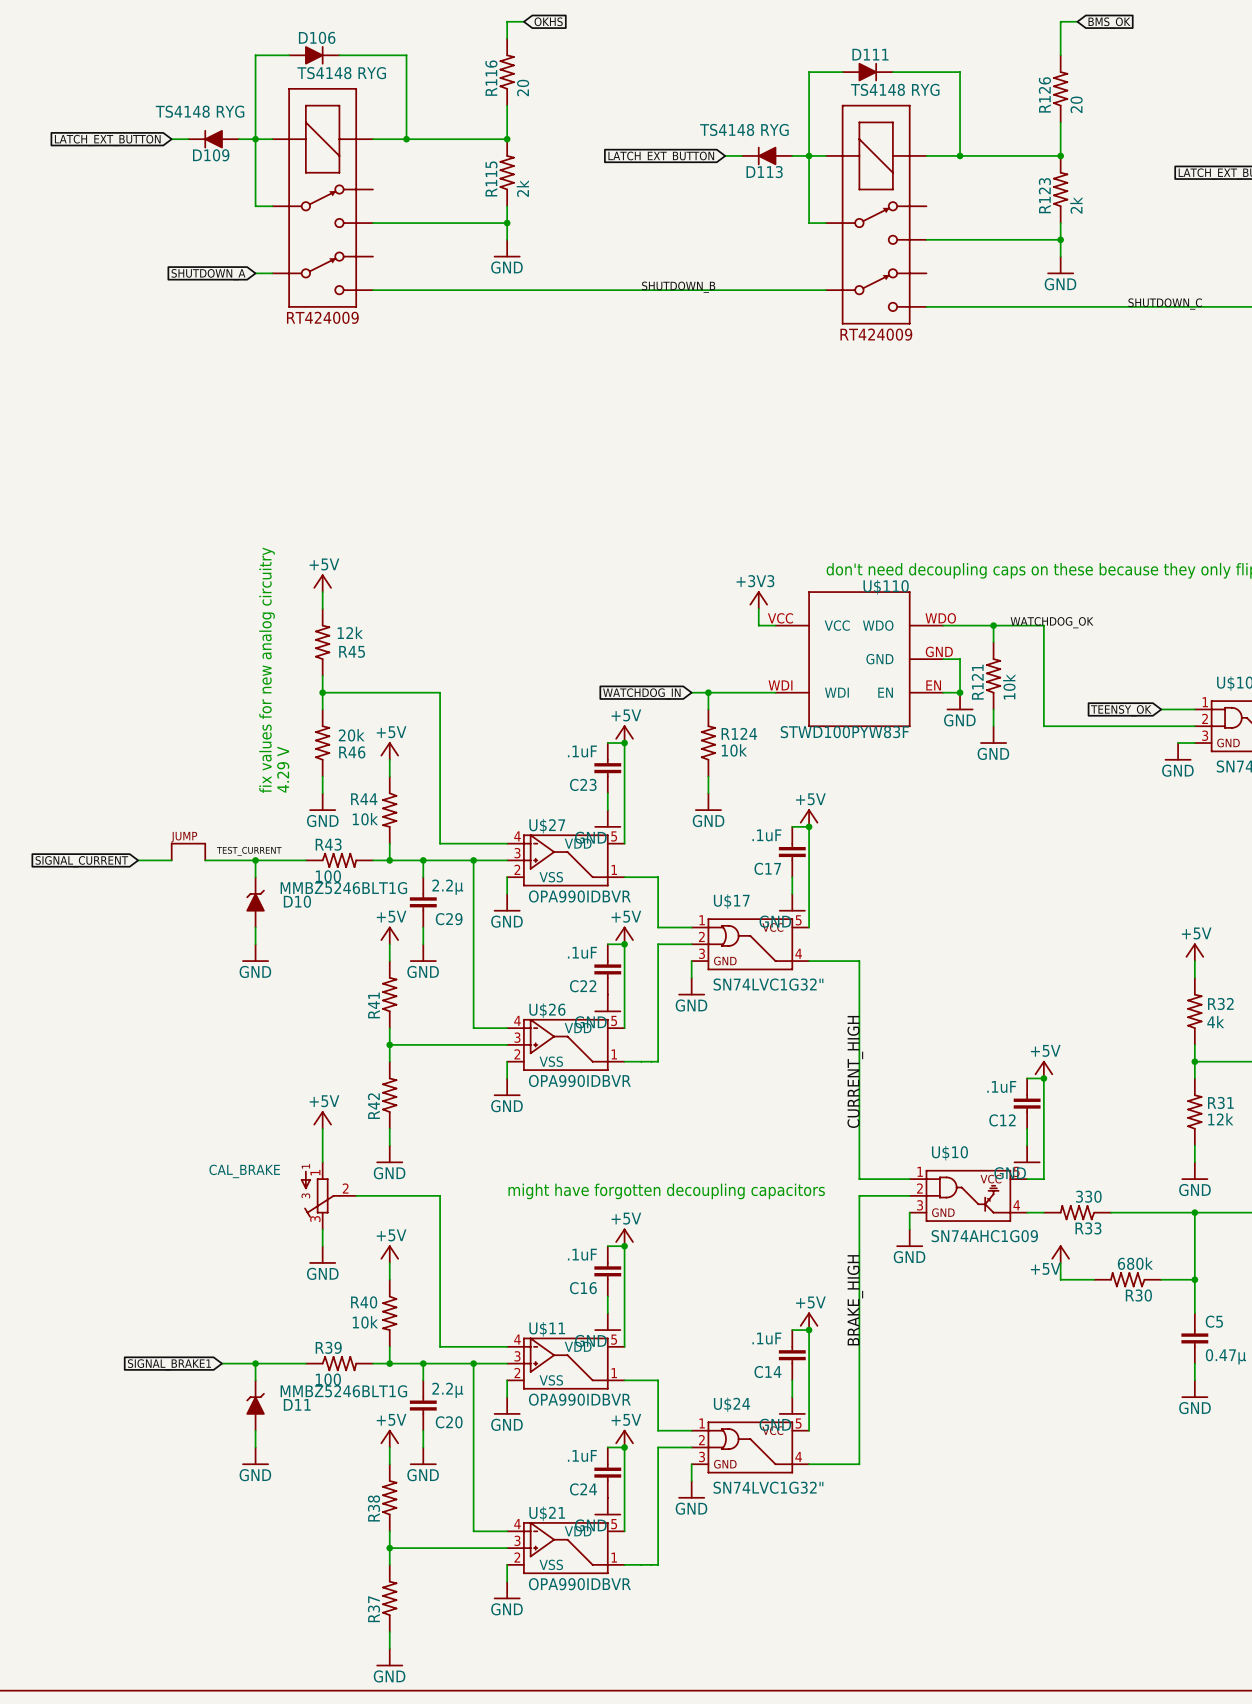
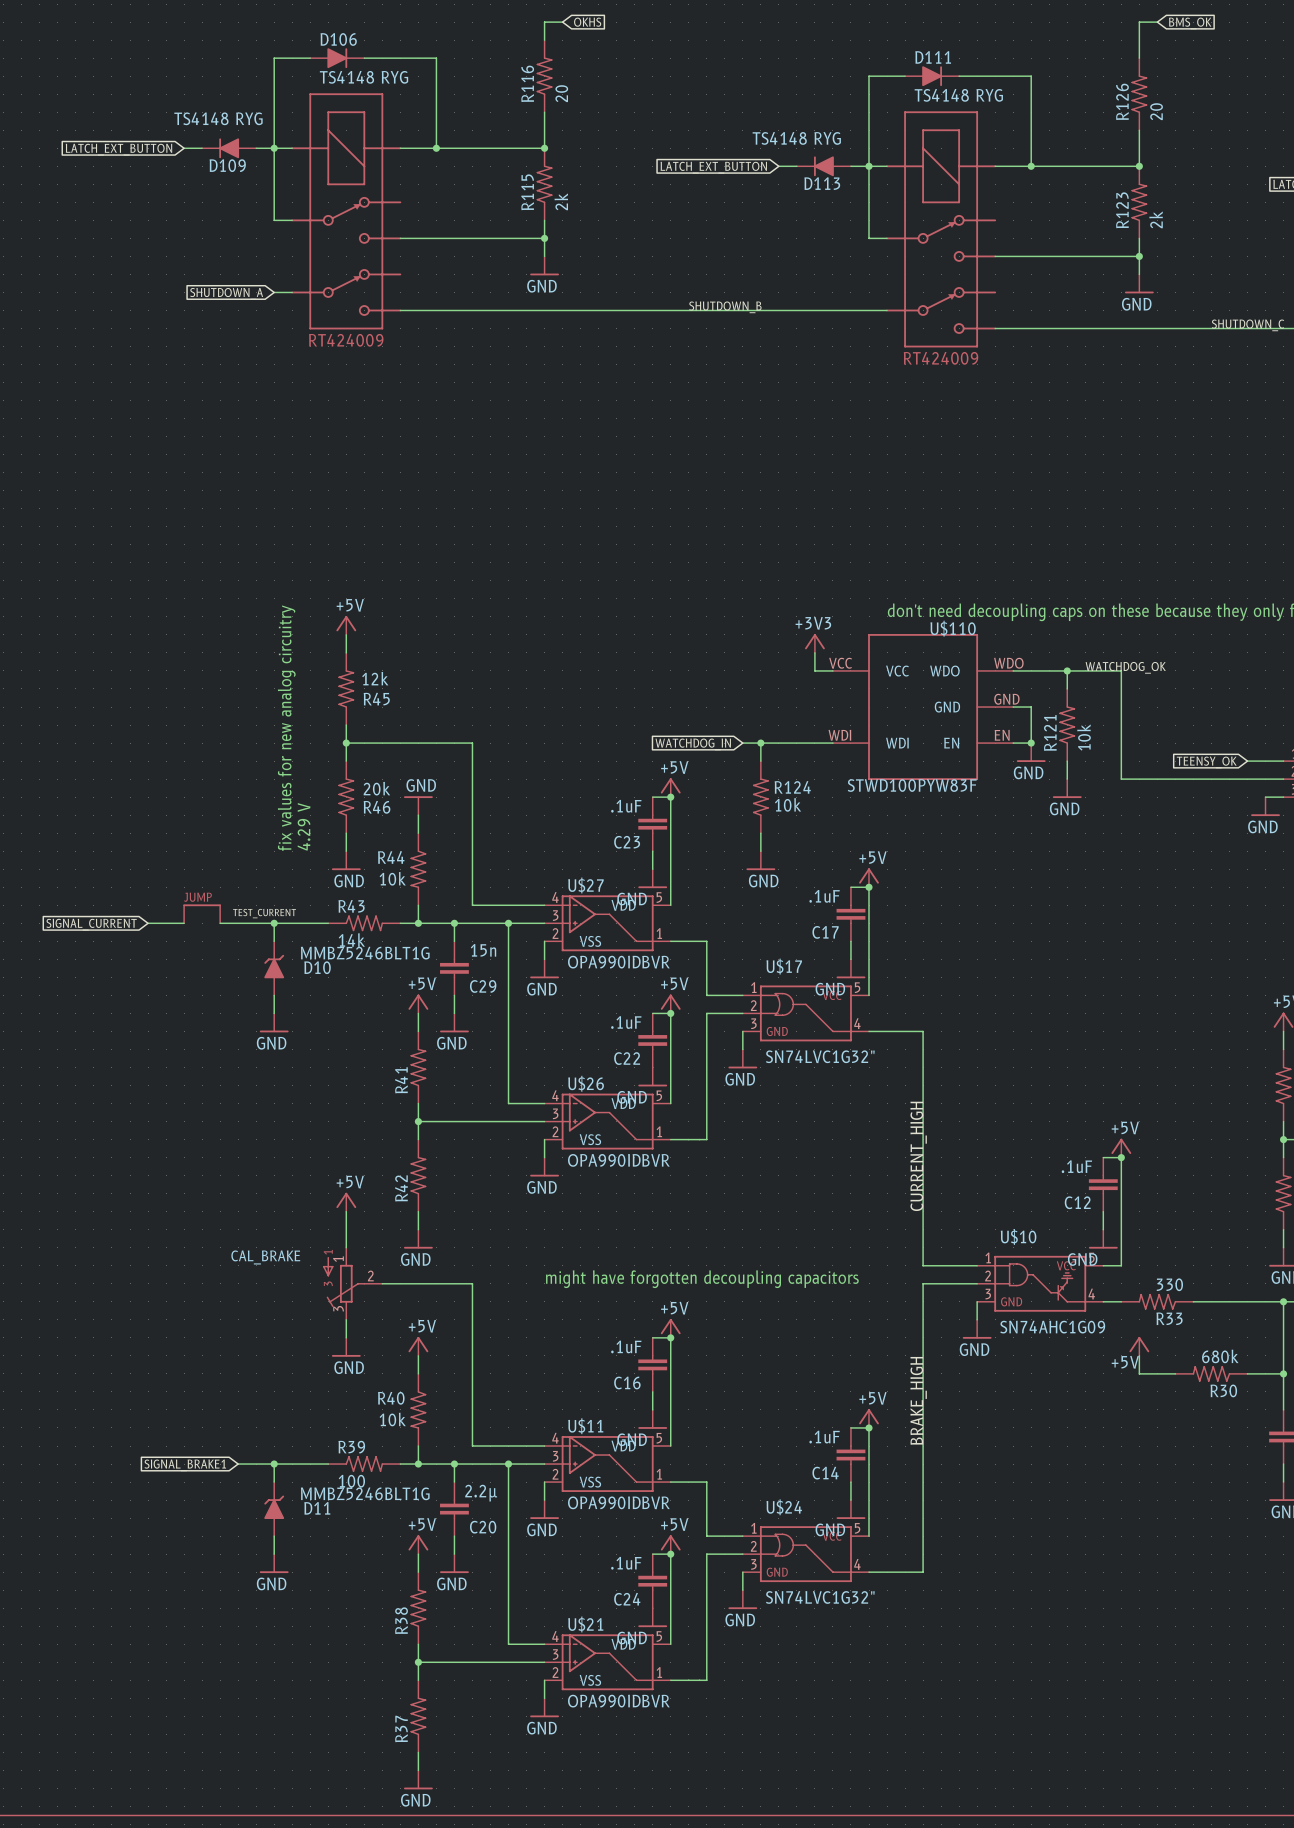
power symbol: +5V (389, 750) -> GND (418, 805)
R43 value: 100 (328, 876) -> 14k (351, 940)
C29 value: 2.2µ (447, 887) -> 15n (483, 950)

